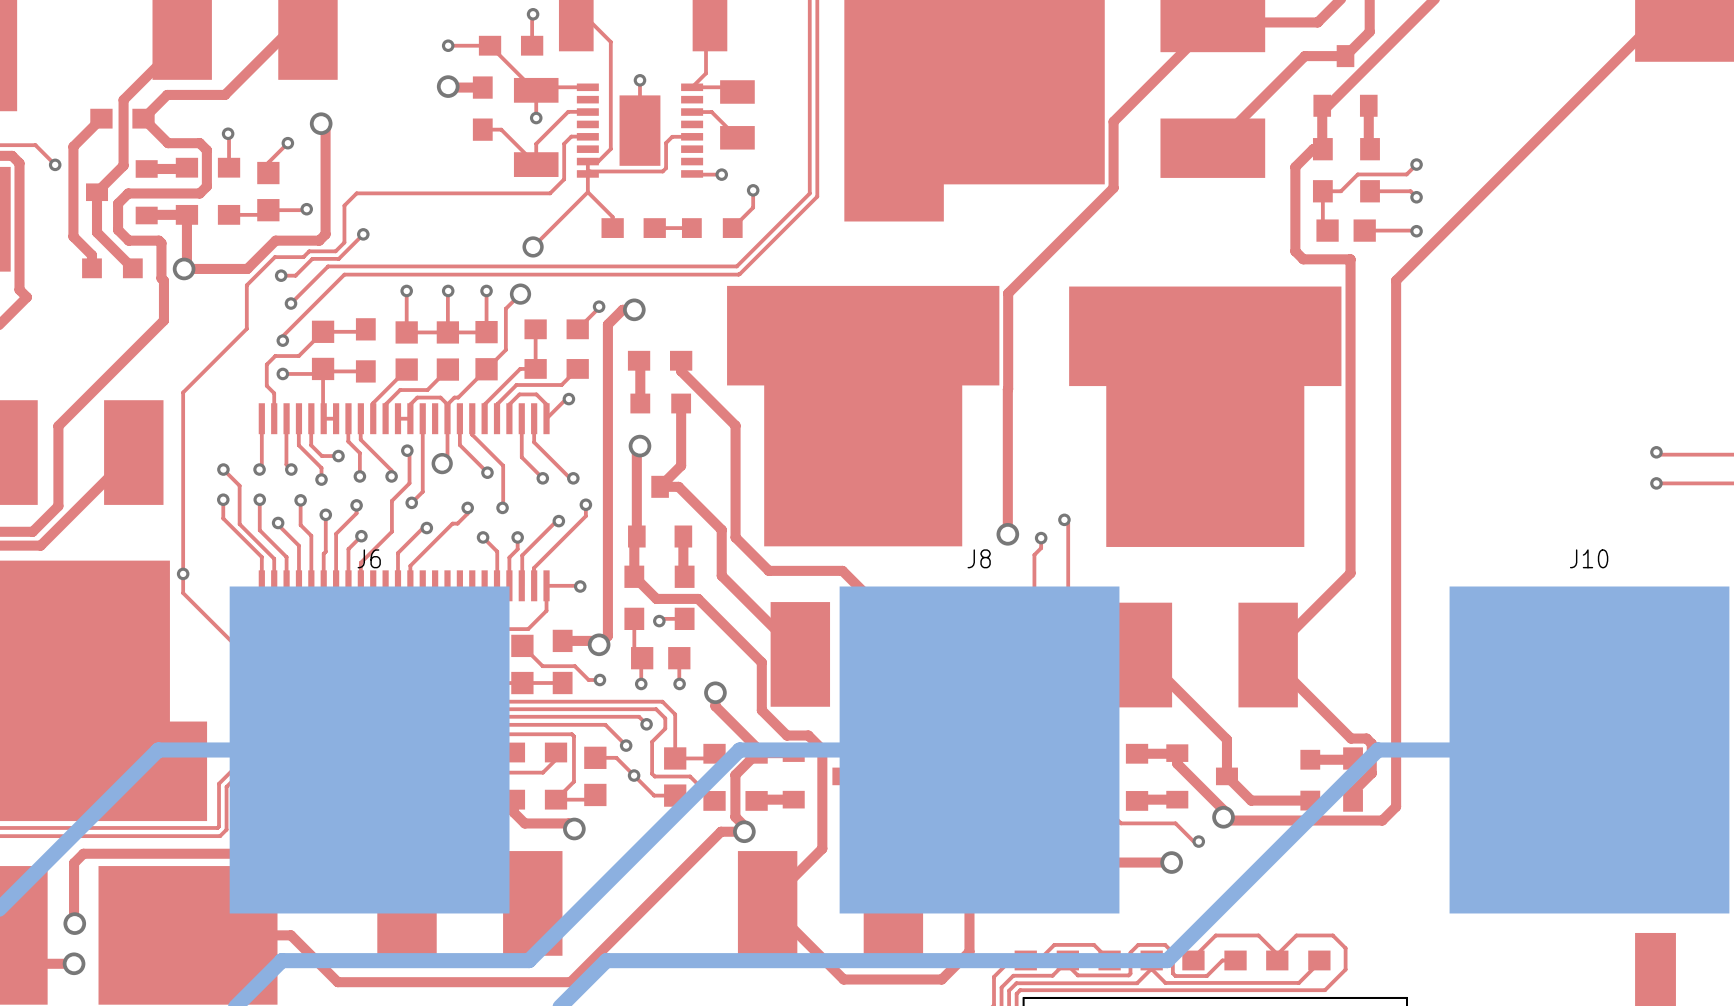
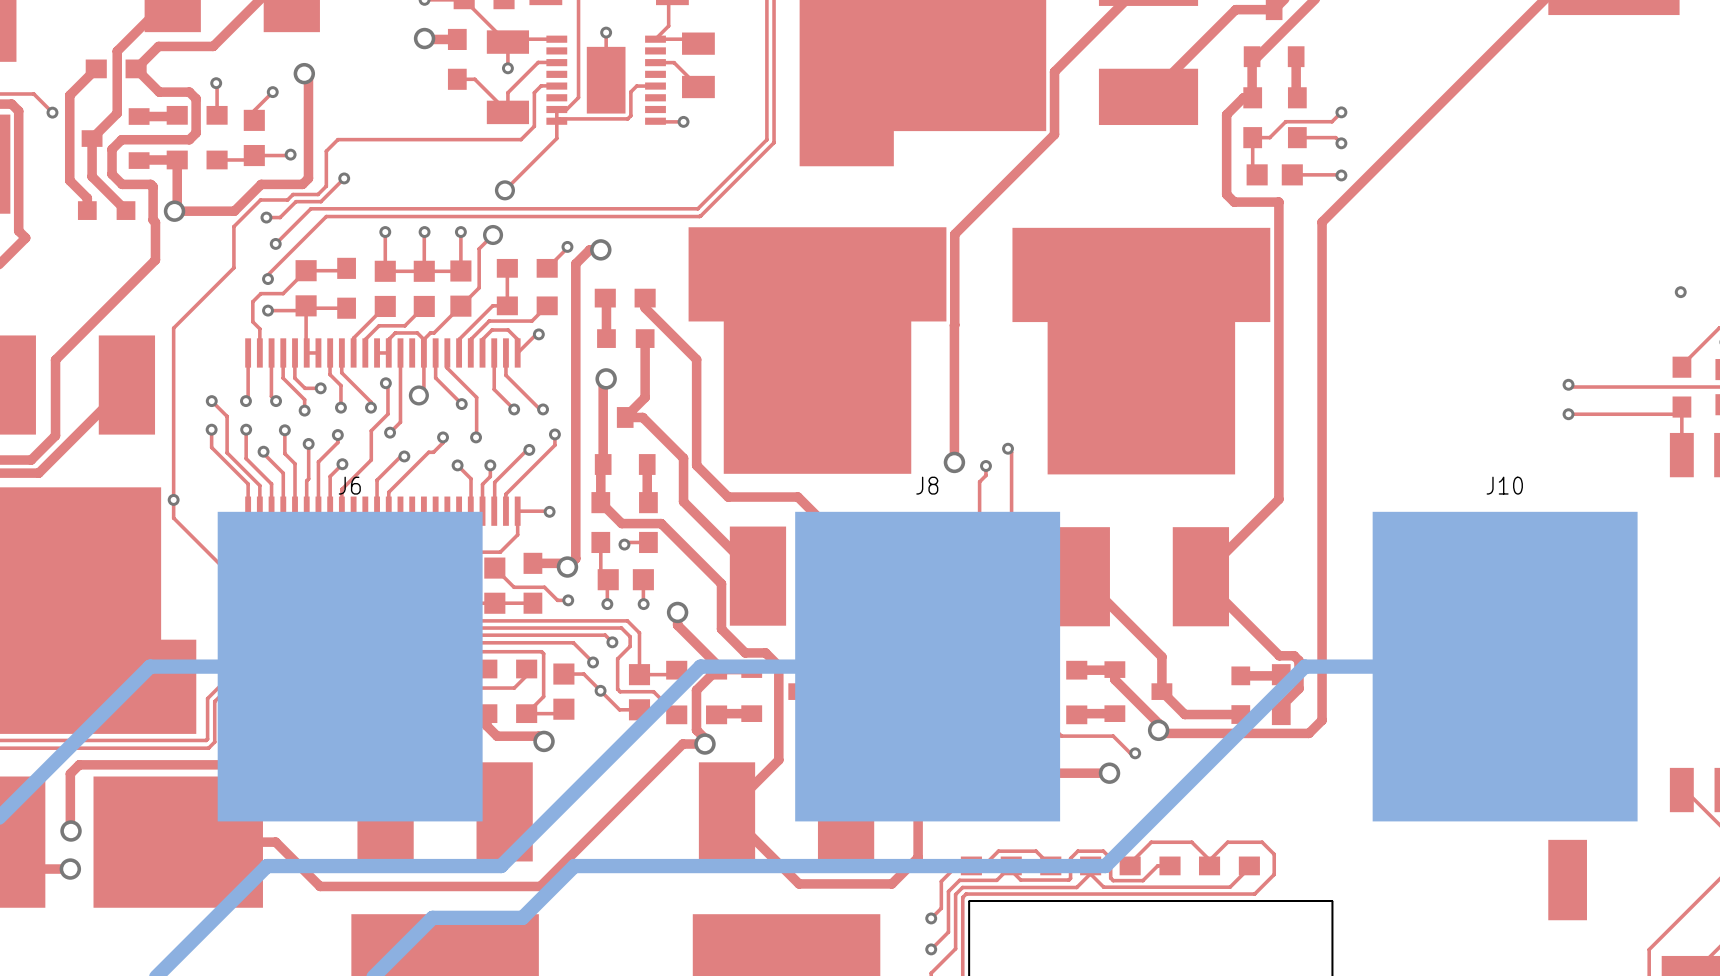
top track: (753, 190) (753, 207) (732, 228) -> none
via: (753, 190) -> none
top track: (587, 192) (612, 216) (612, 228) -> none
part: (633, 228) -> none
top track: (691, 228) (654, 228) -> none
part: (712, 228) -> none

